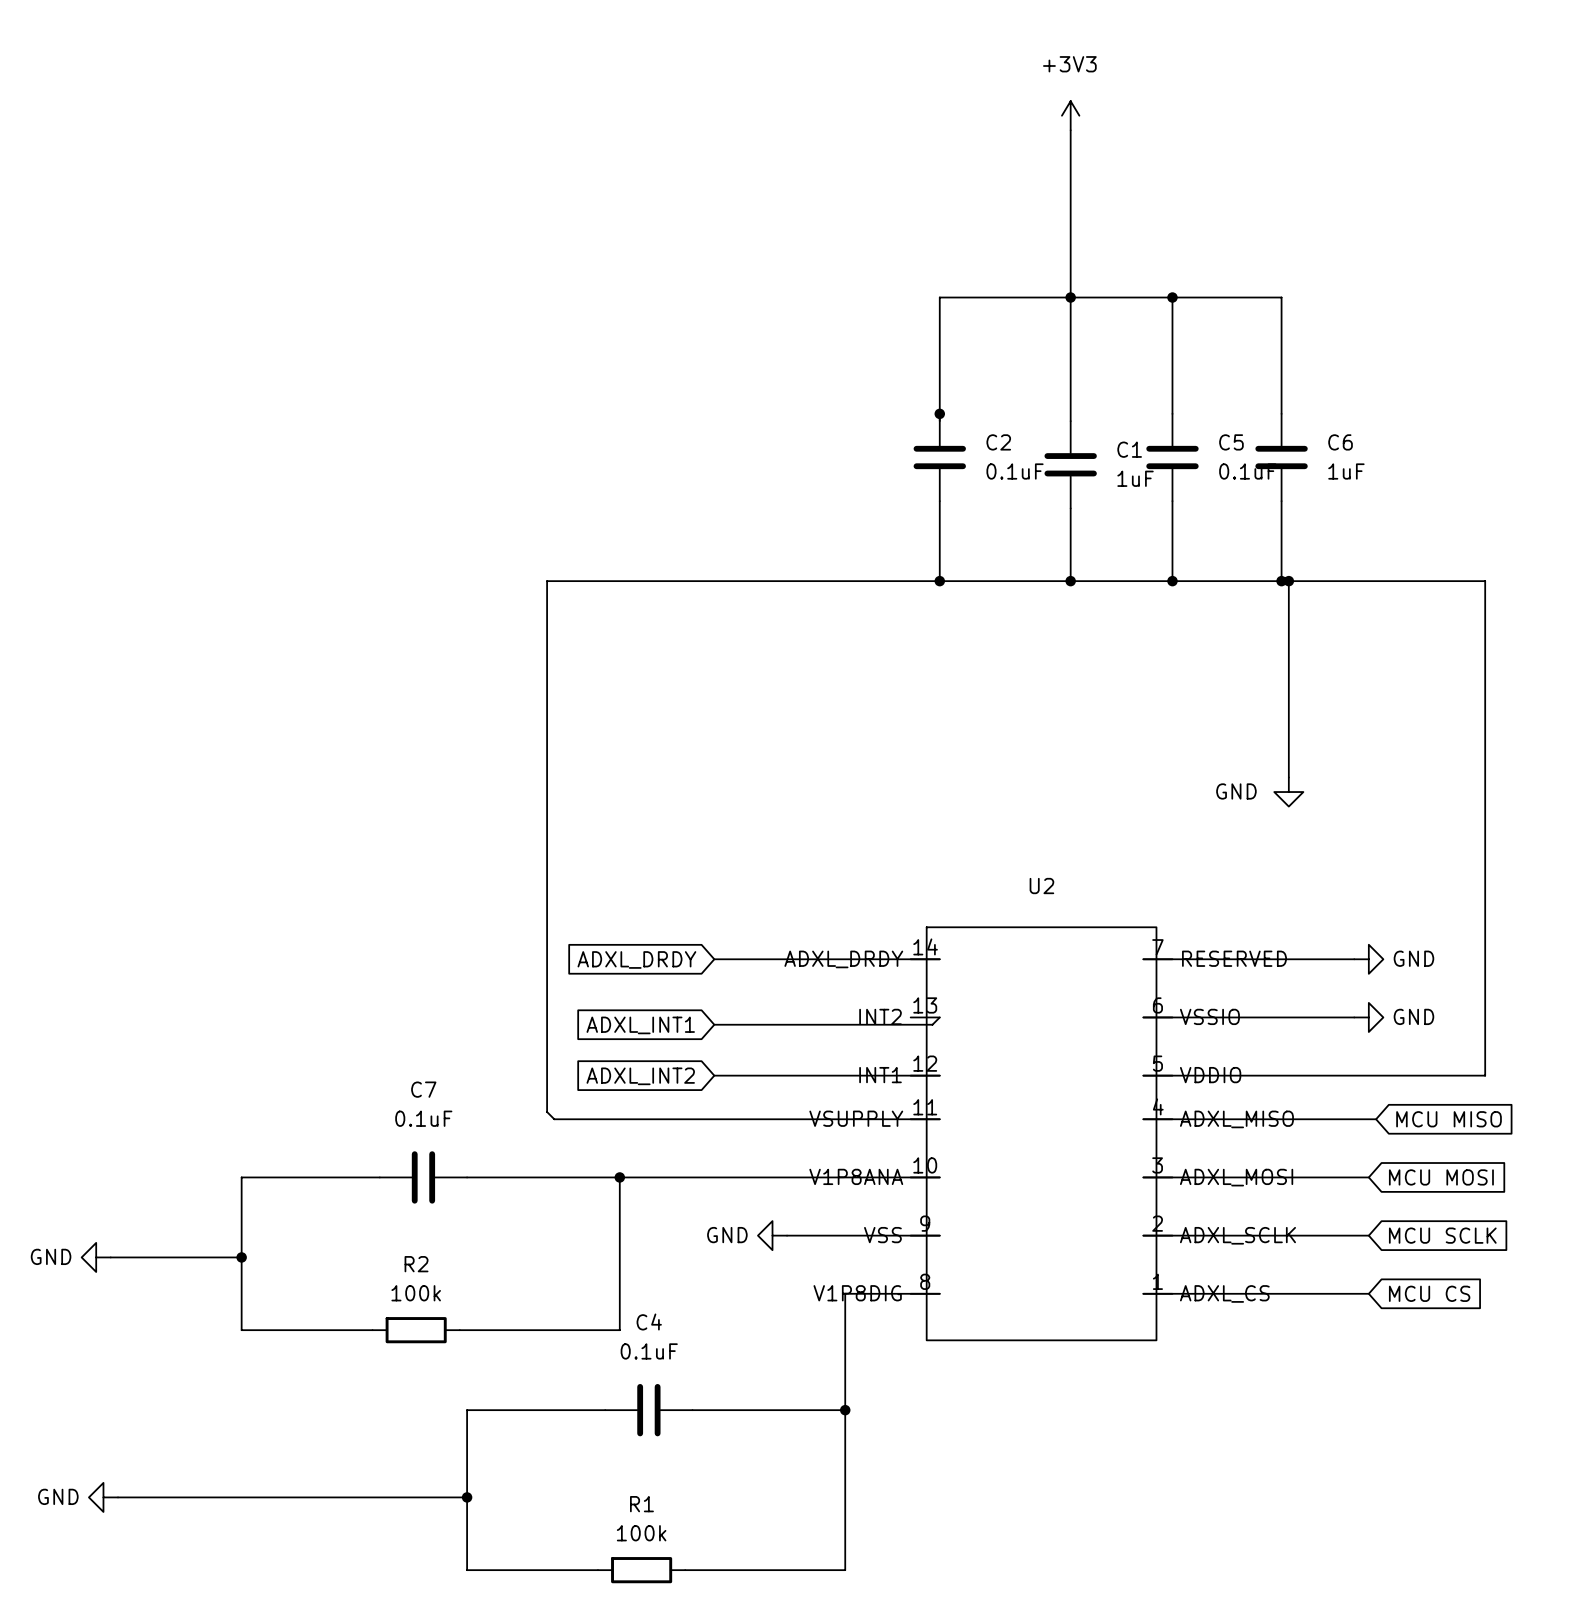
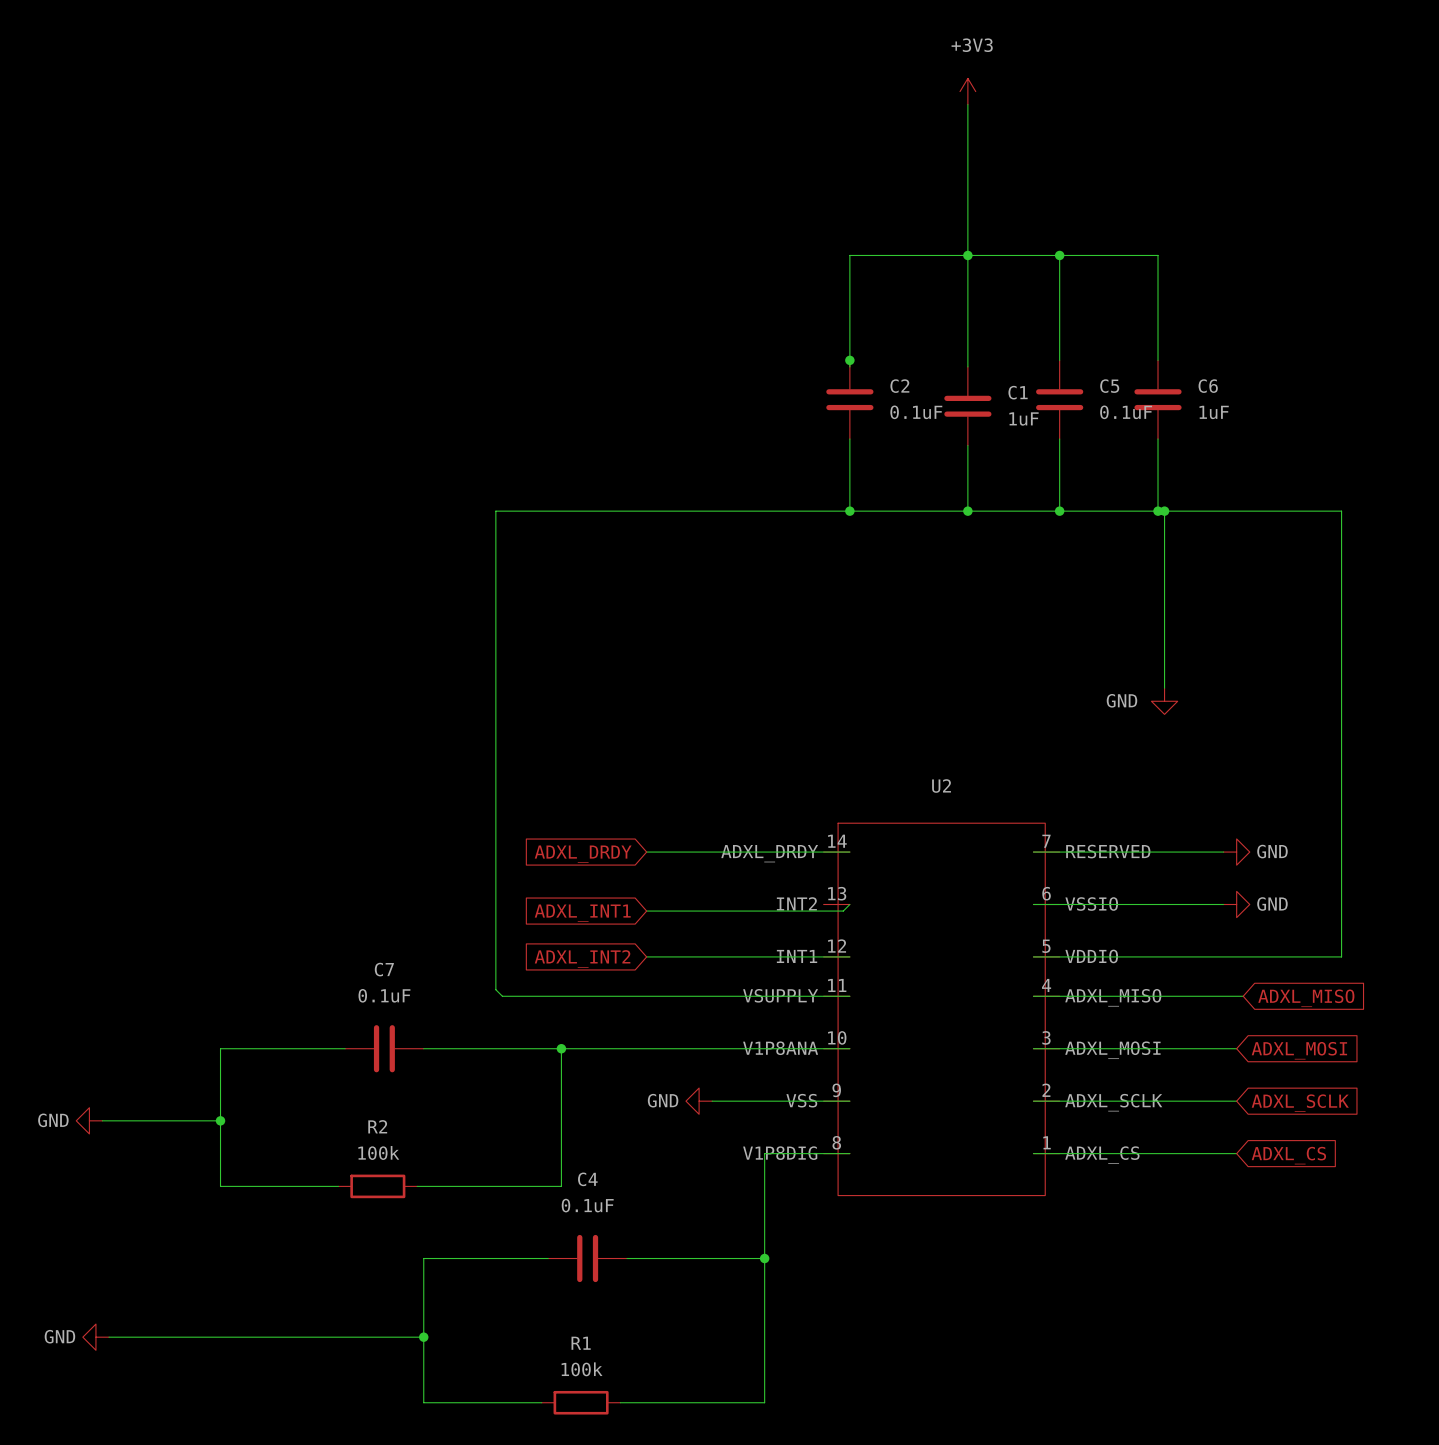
global label: MCU MISO (1449, 1119) -> ADXL_MISO (1306, 998)
global label: MCU MOSI (1441, 1177) -> ADXL_MOSI (1299, 1050)
global label: MCU SCLK (1442, 1235) -> ADXL_SCLK (1300, 1103)
global label: MCU CS (1429, 1293) -> ADXL_CS (1288, 1155)

